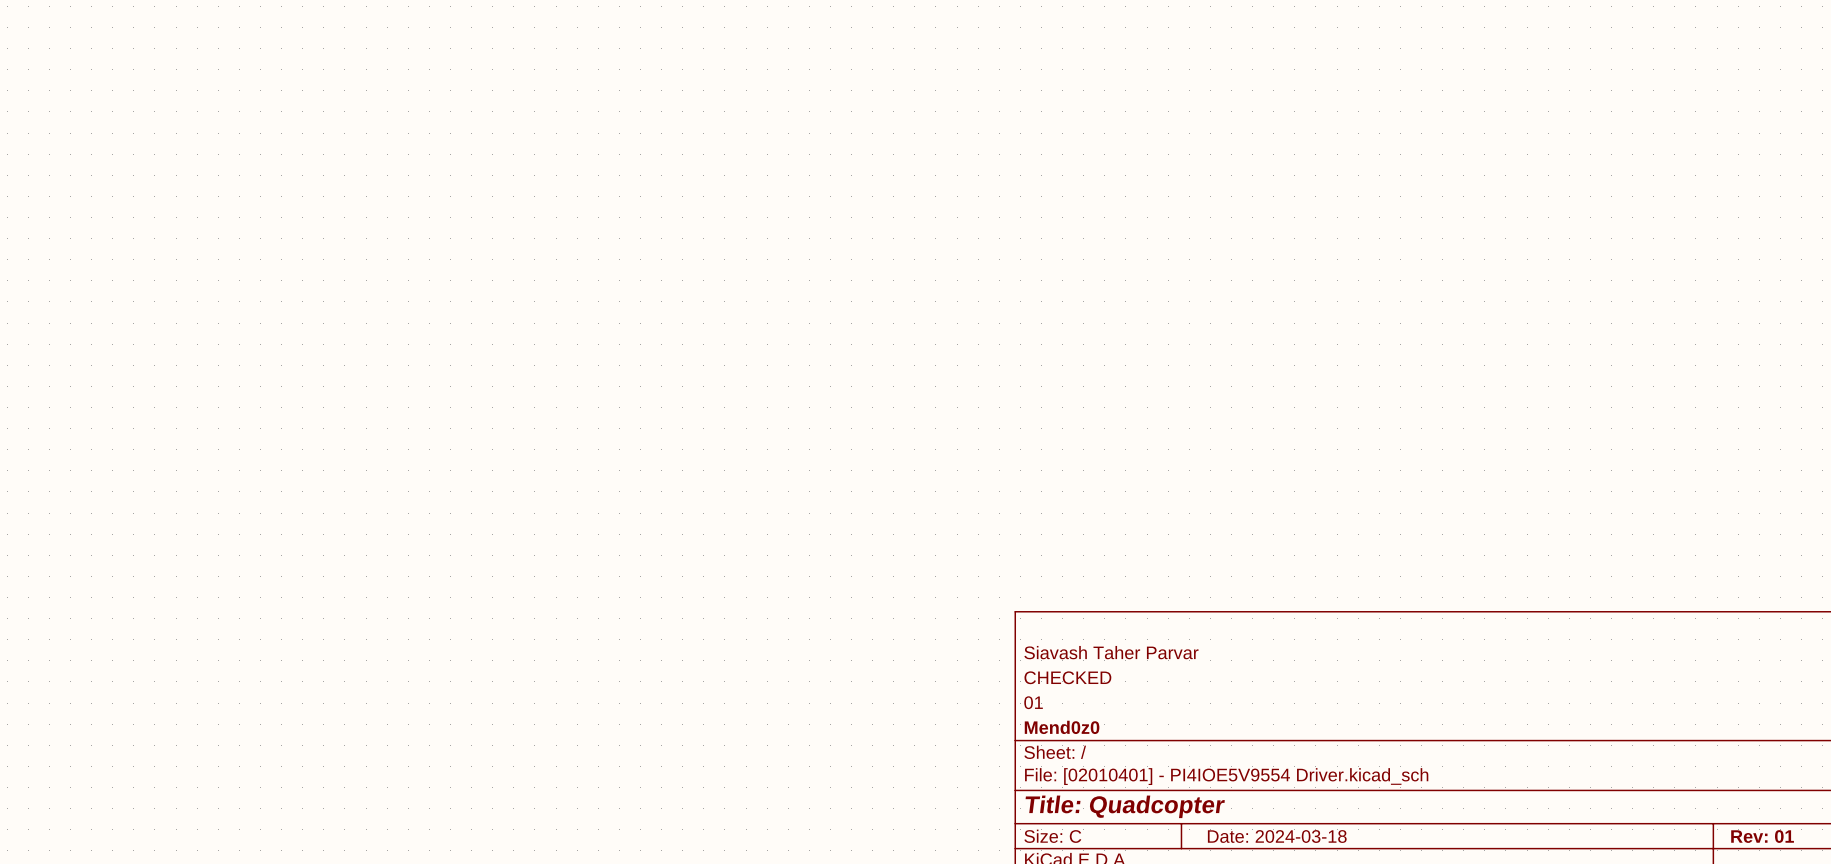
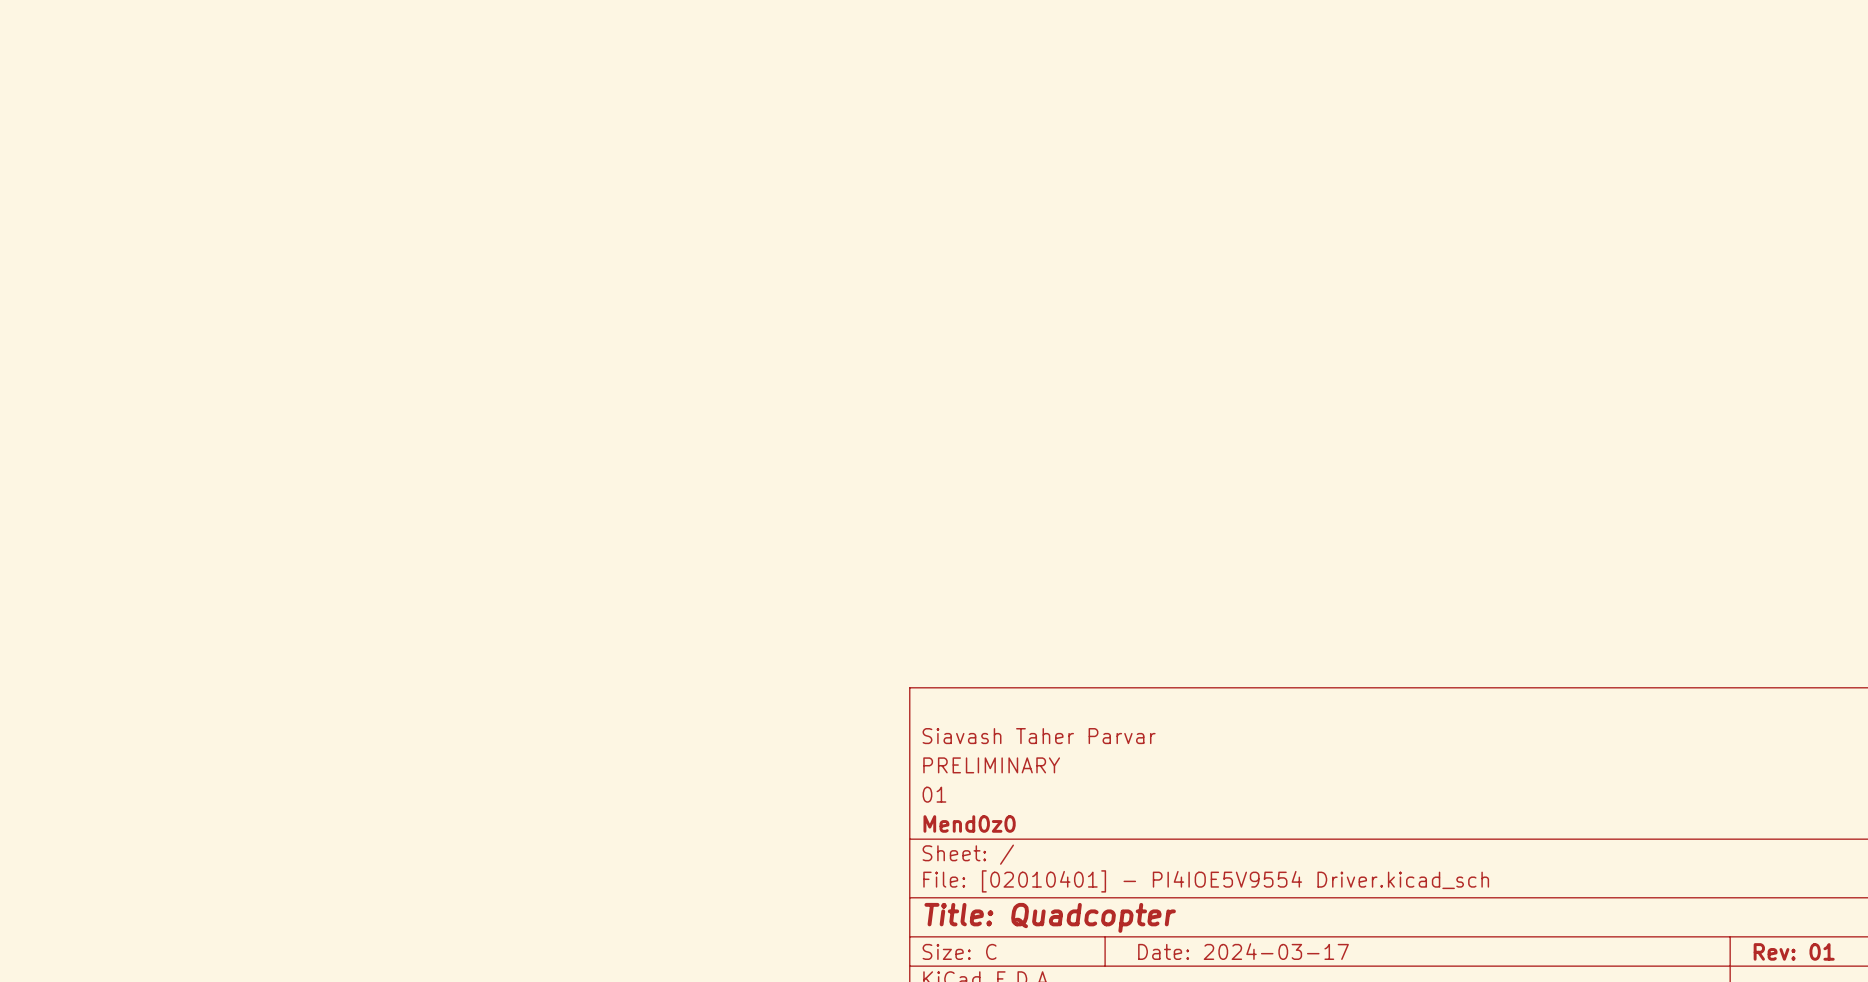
title block: CHECKED (1067, 677) -> PRELIMINARY (991, 765)
title block: Date: 2024-03-18 (1277, 836) -> Date: 2024-03-17 (1243, 951)

